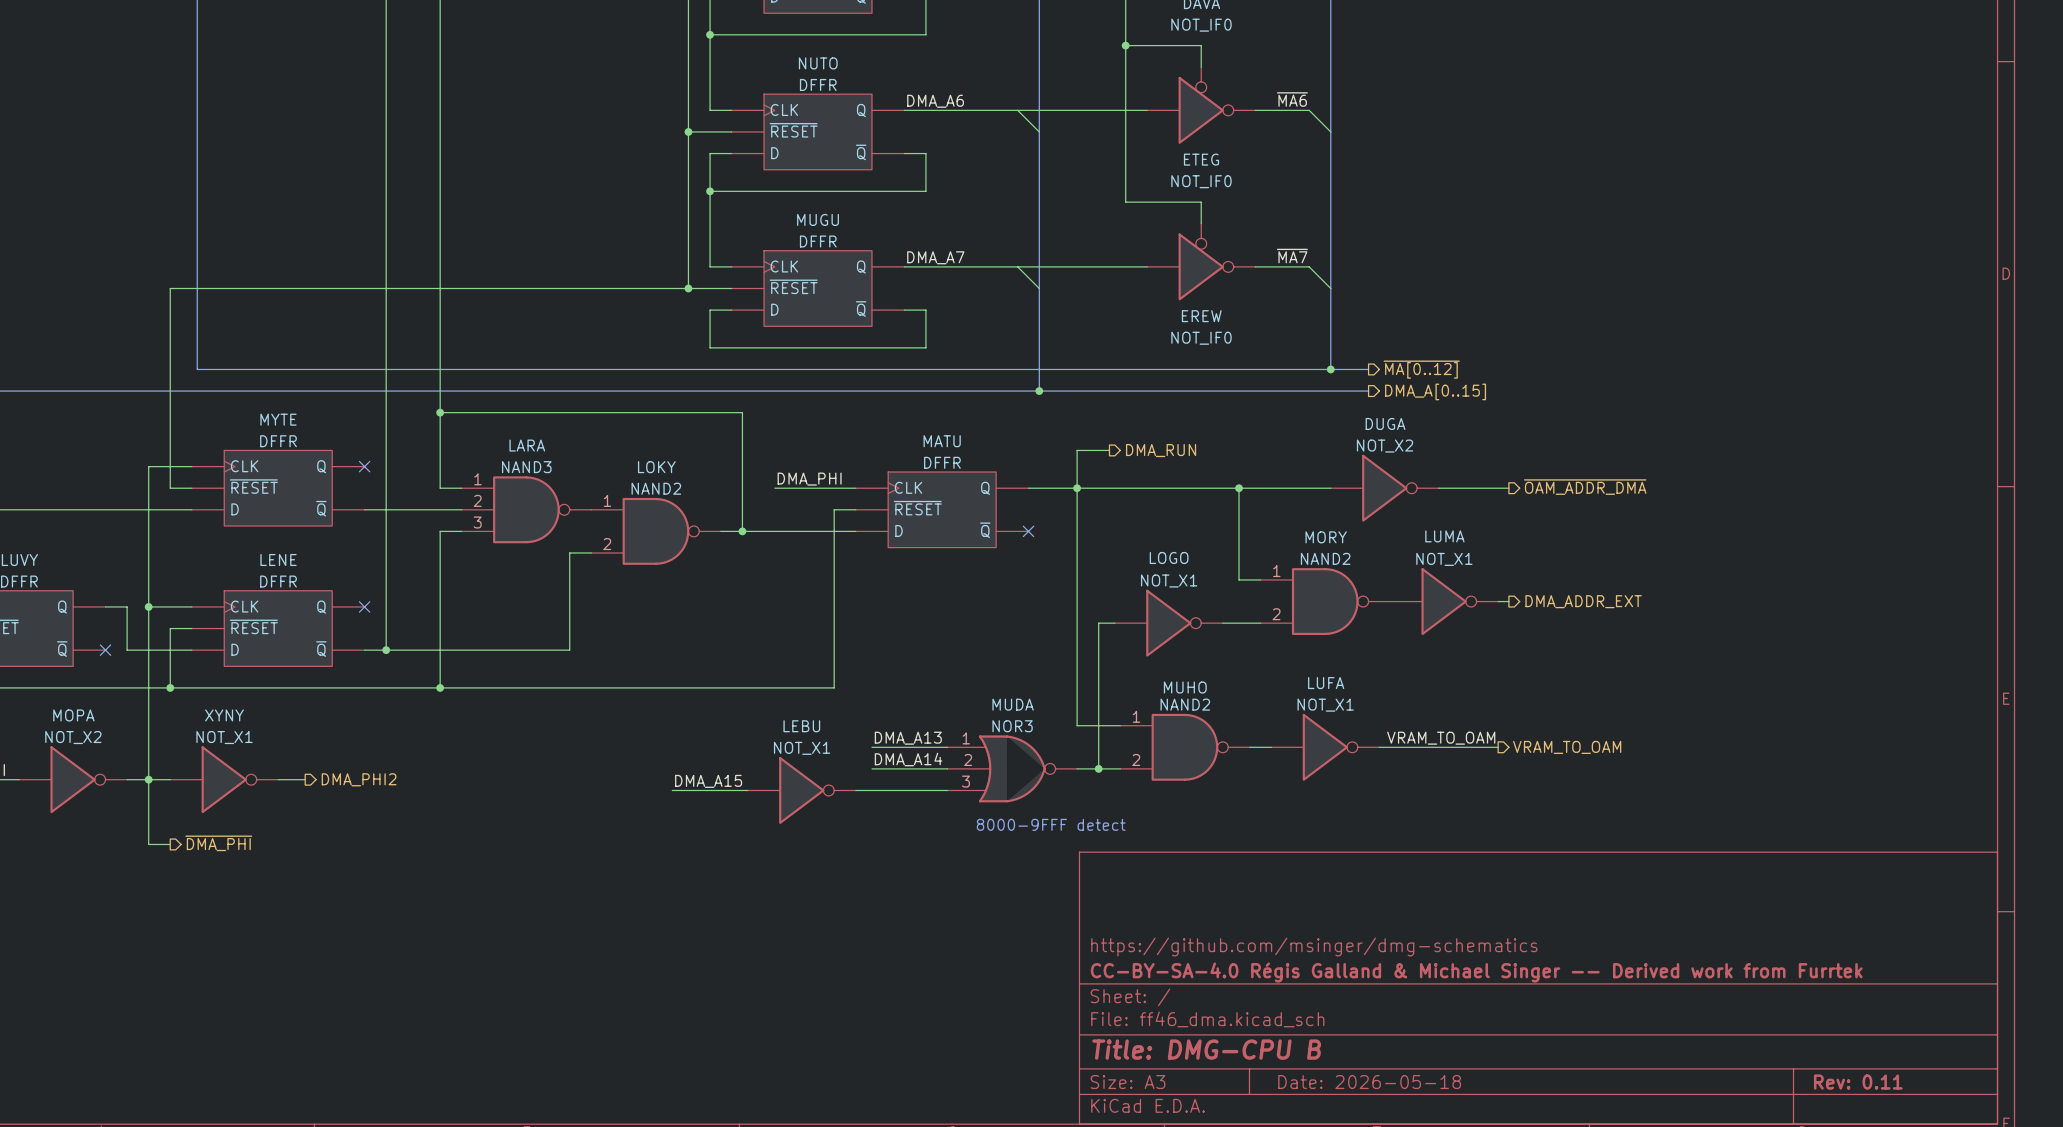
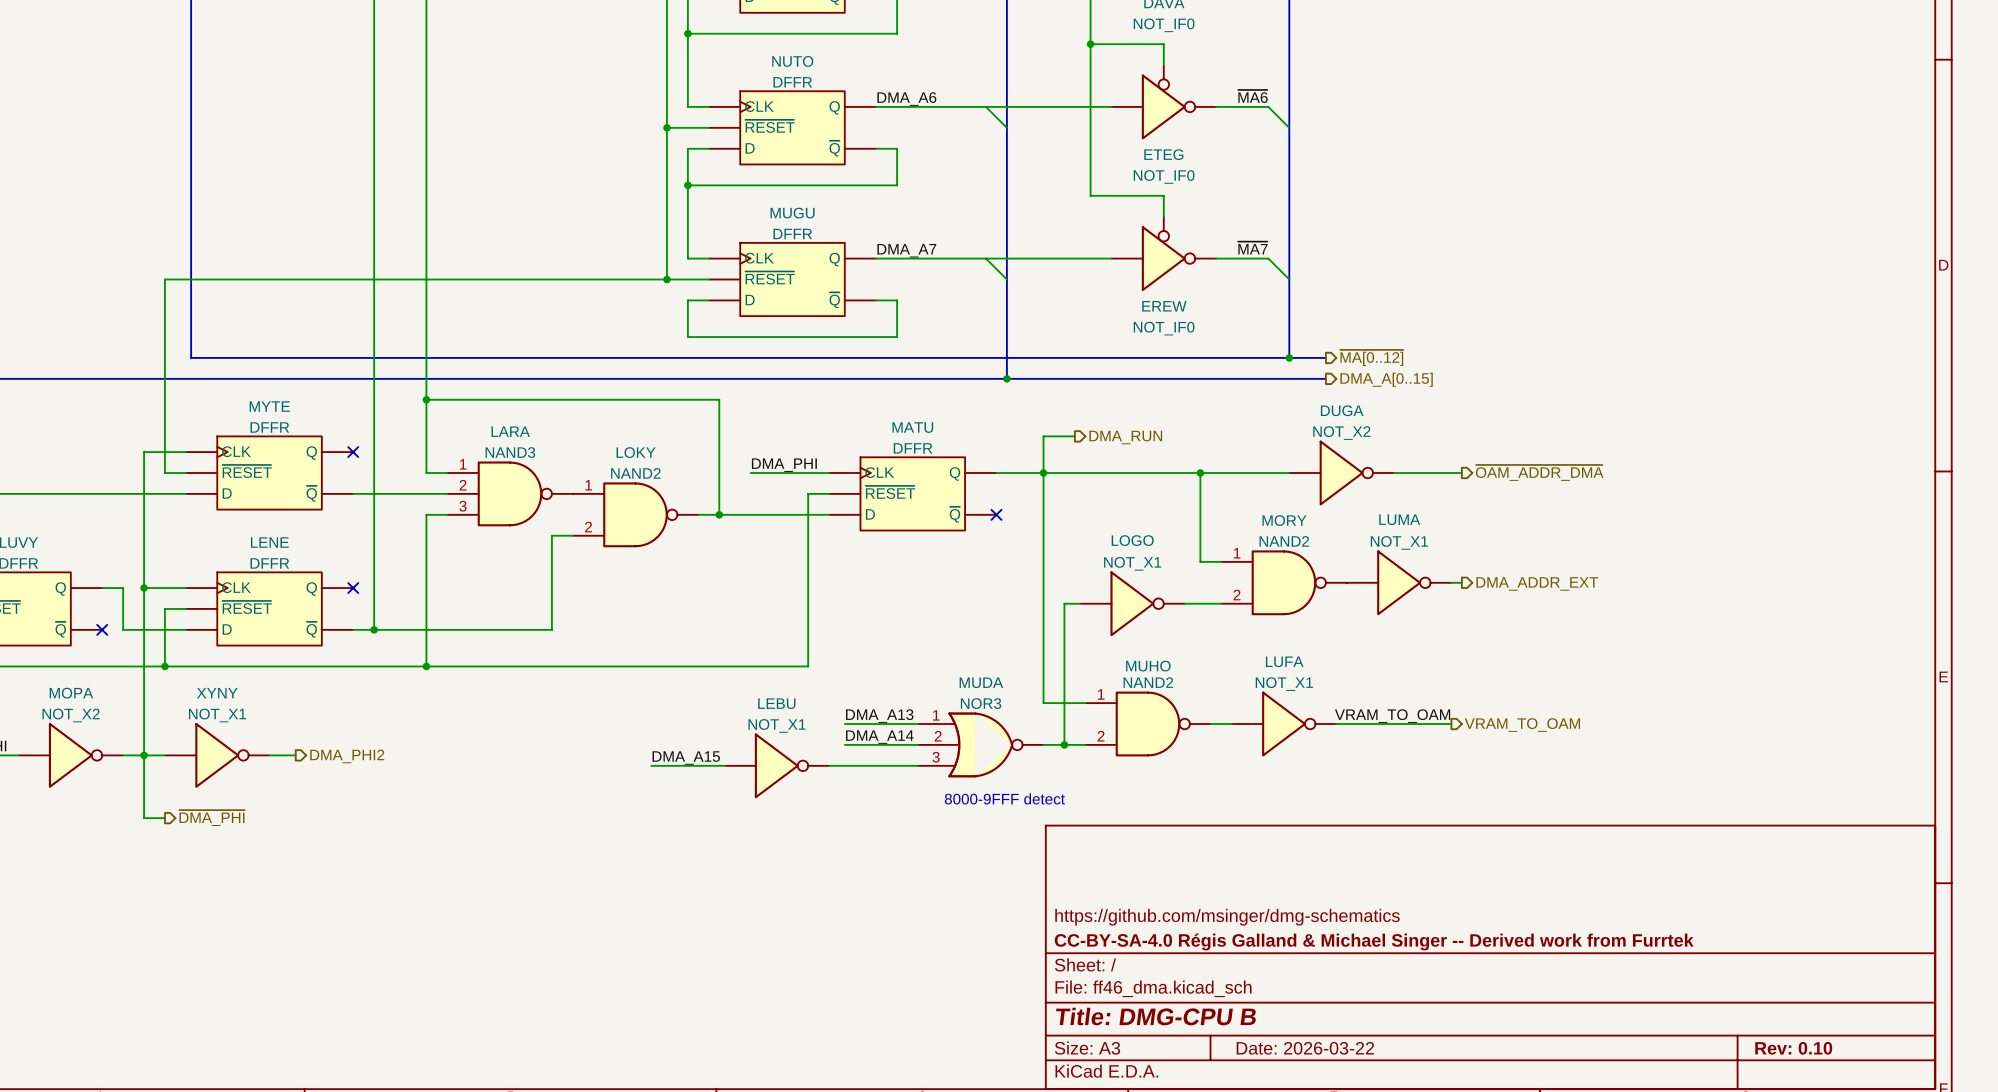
title block: Date: 2026-05-18 (1369, 1082) -> Date: 2026-03-22 (1305, 1048)
title block: Rev: 0.11 (1858, 1082) -> Rev: 0.10 (1793, 1048)

